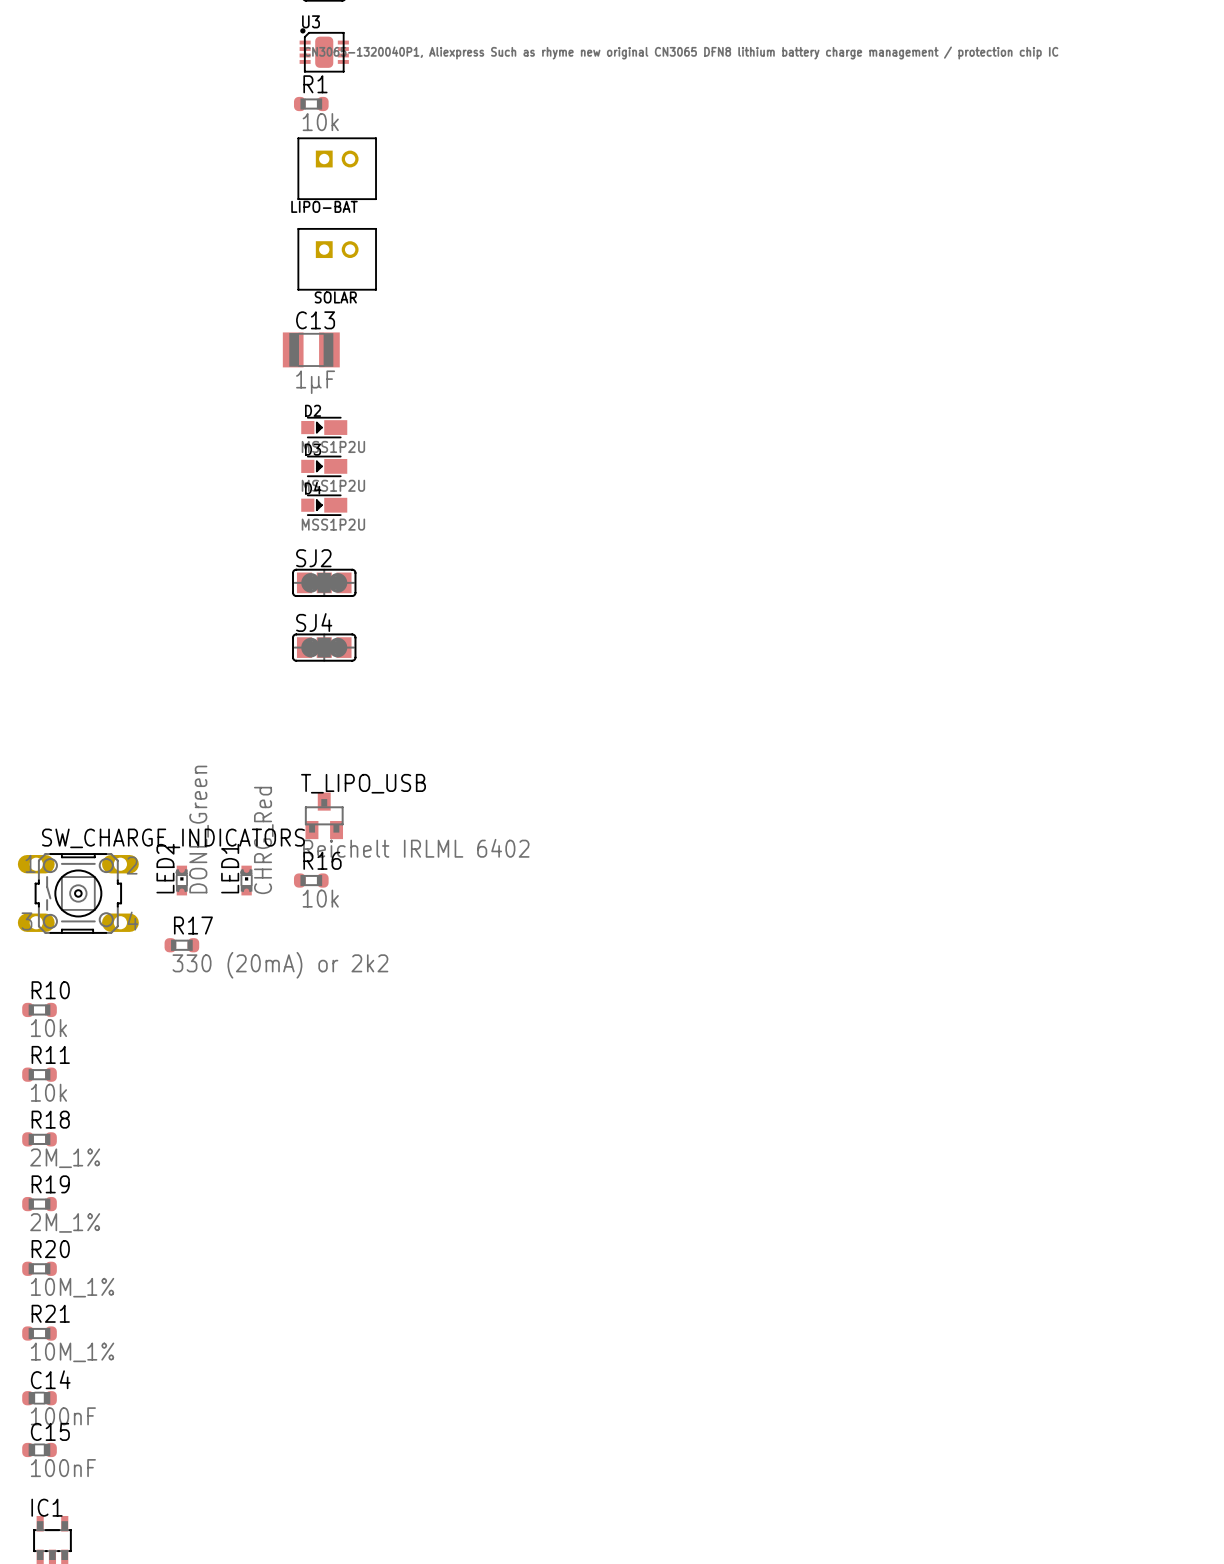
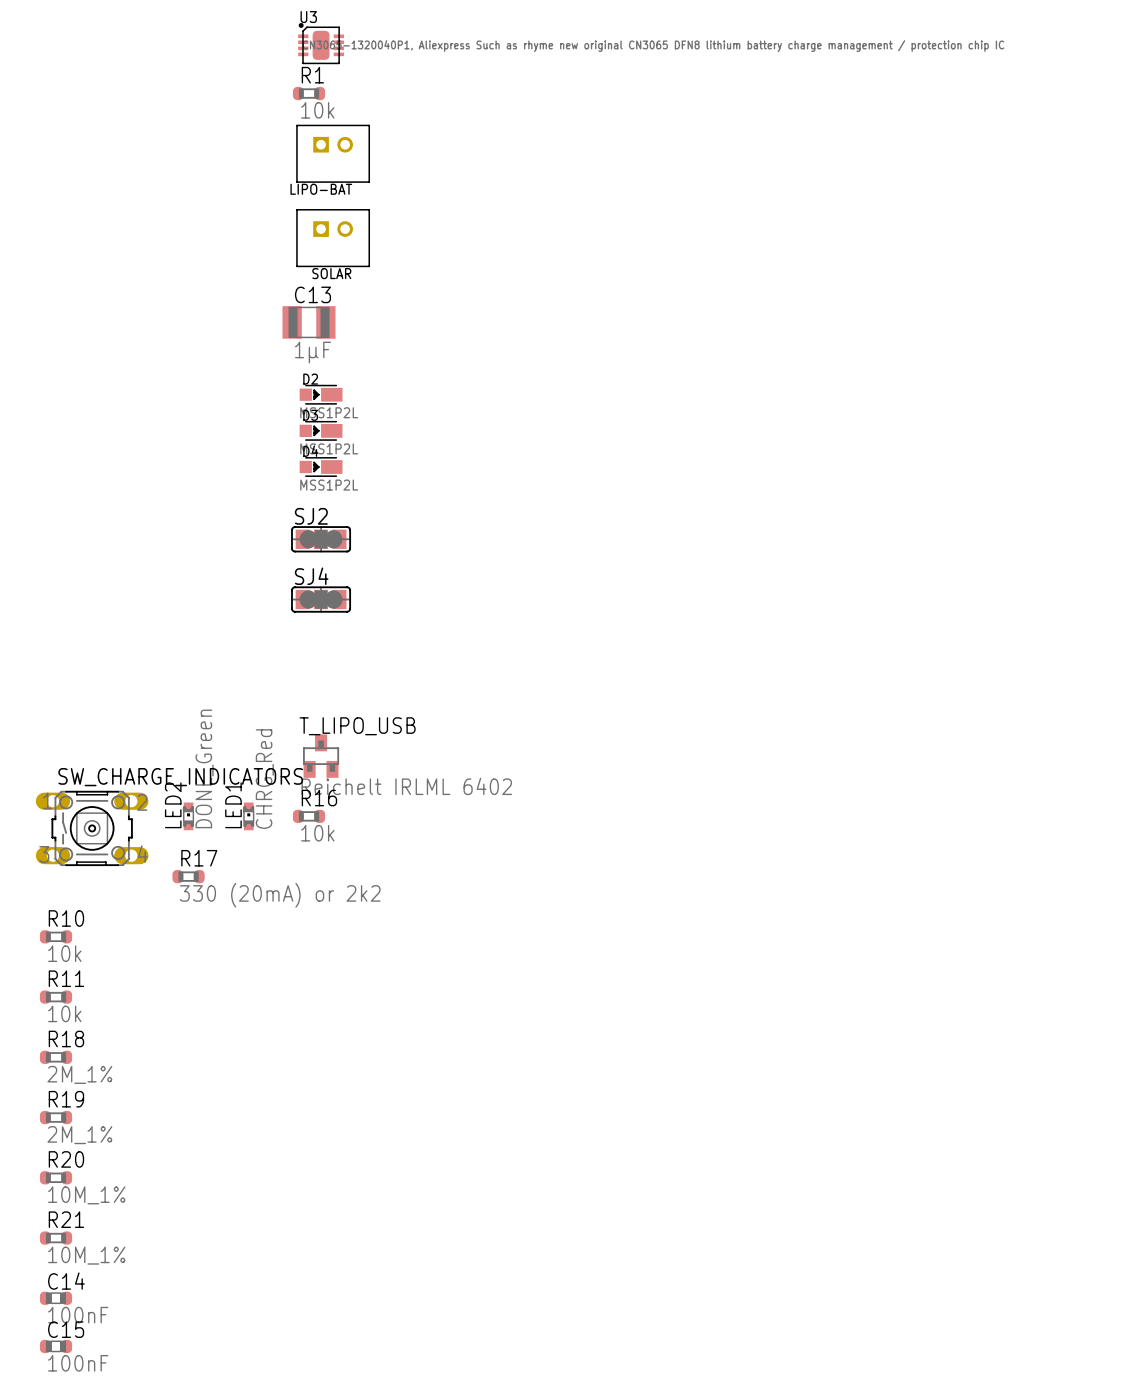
D2 value: MSS1P2U (333, 446) -> MSS1P2L (329, 412)
D3 value: MSS1P2U (333, 485) -> MSS1P2L (329, 448)
D4 value: MSS1P2U (333, 524) -> MSS1P2L (329, 485)

